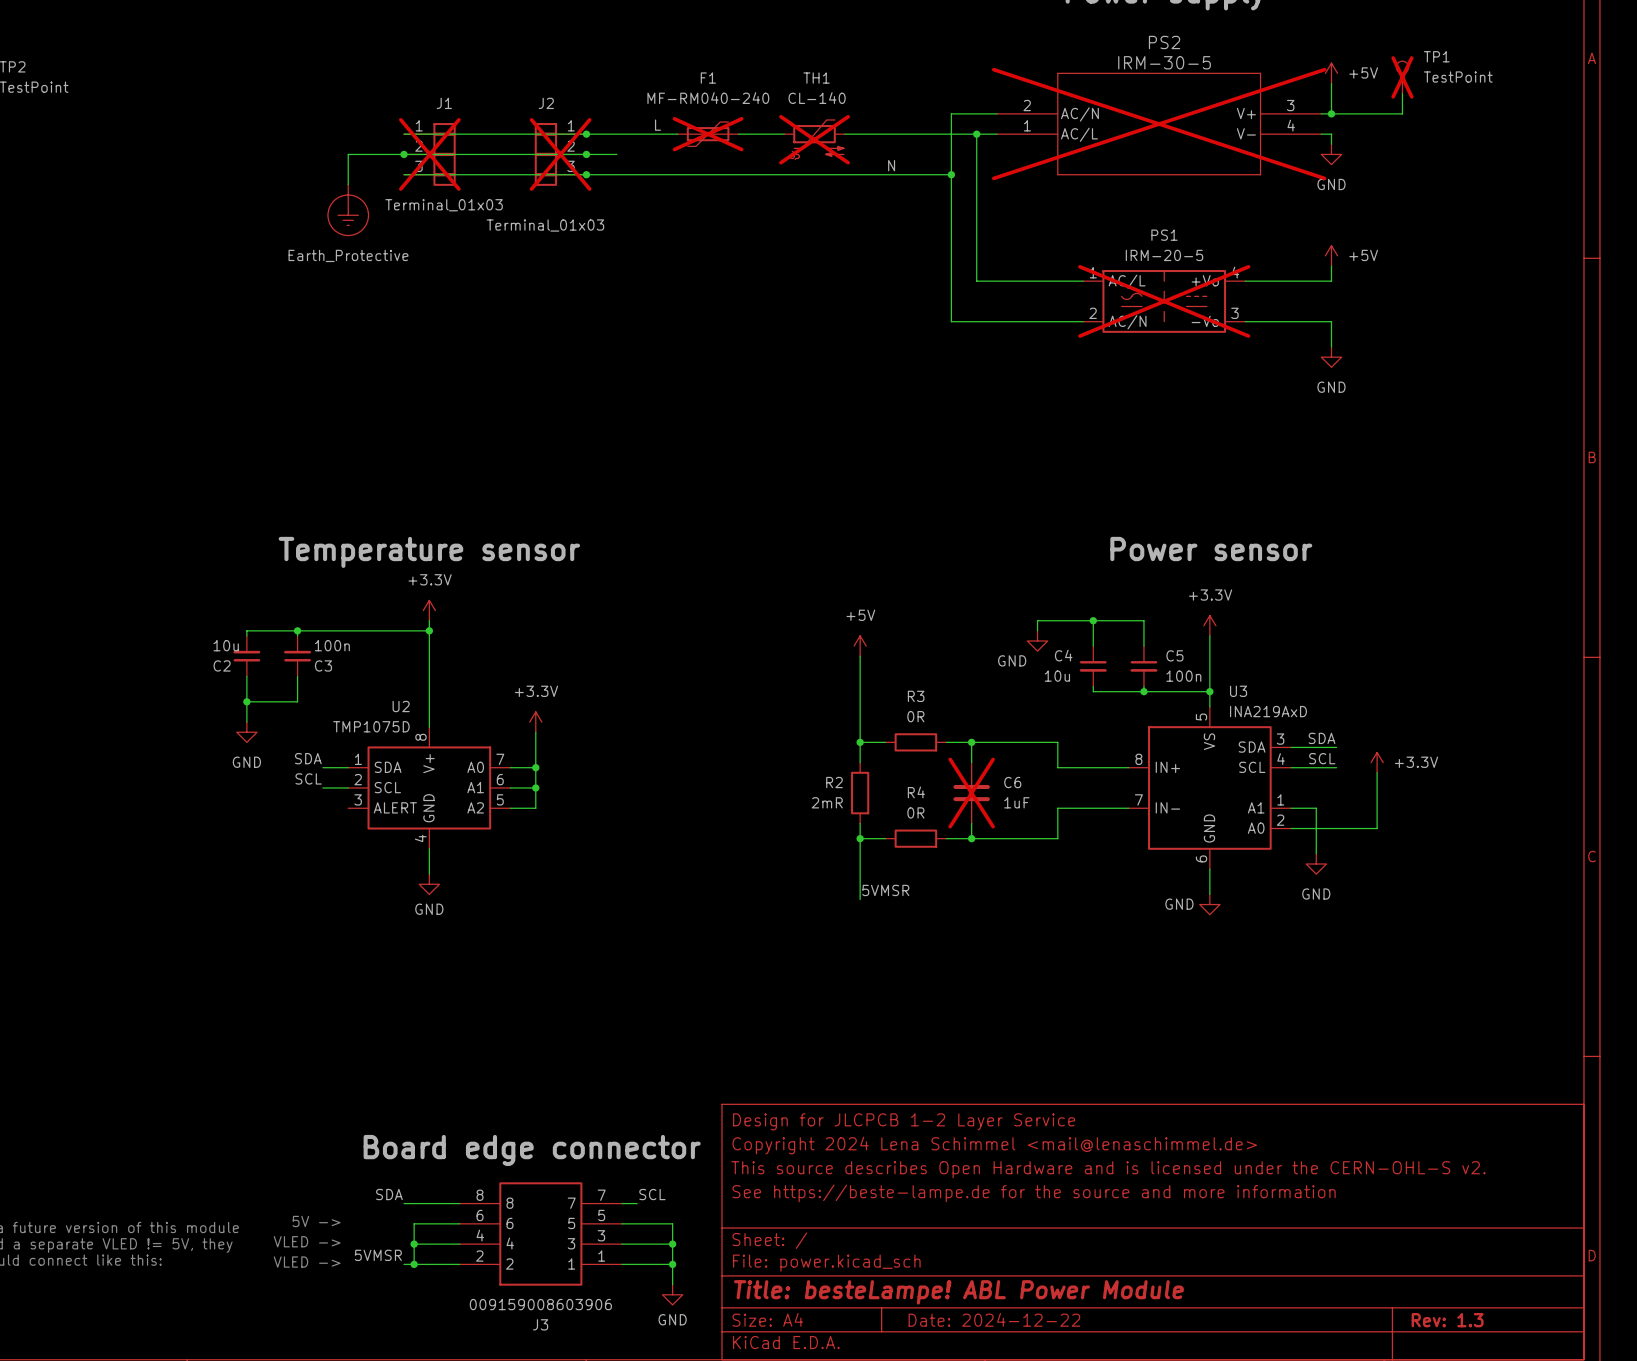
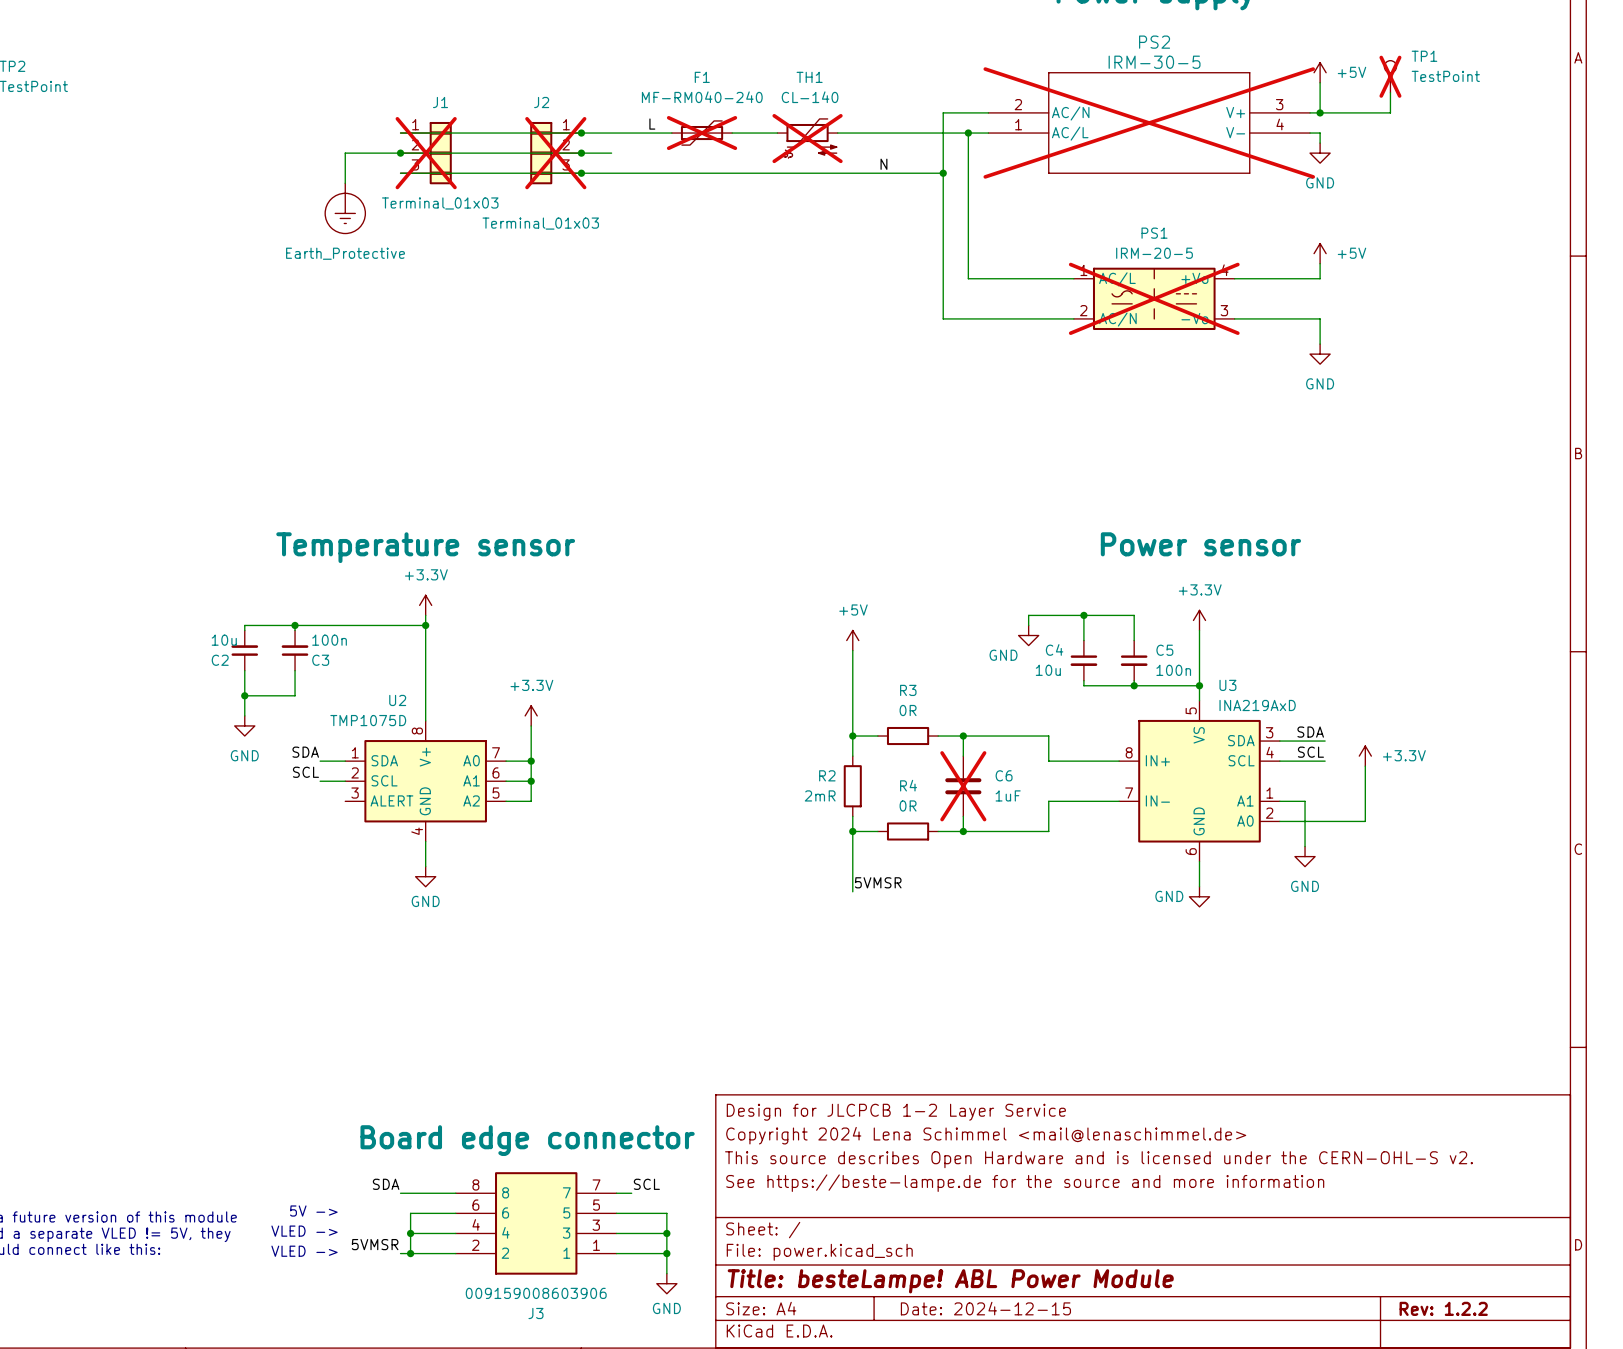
title block: Date: 2024-12-22 (994, 1319) -> Date: 2024-12-15 (985, 1308)
title block: Rev: 1.3 (1447, 1320) -> Rev: 1.2.2 (1443, 1308)

